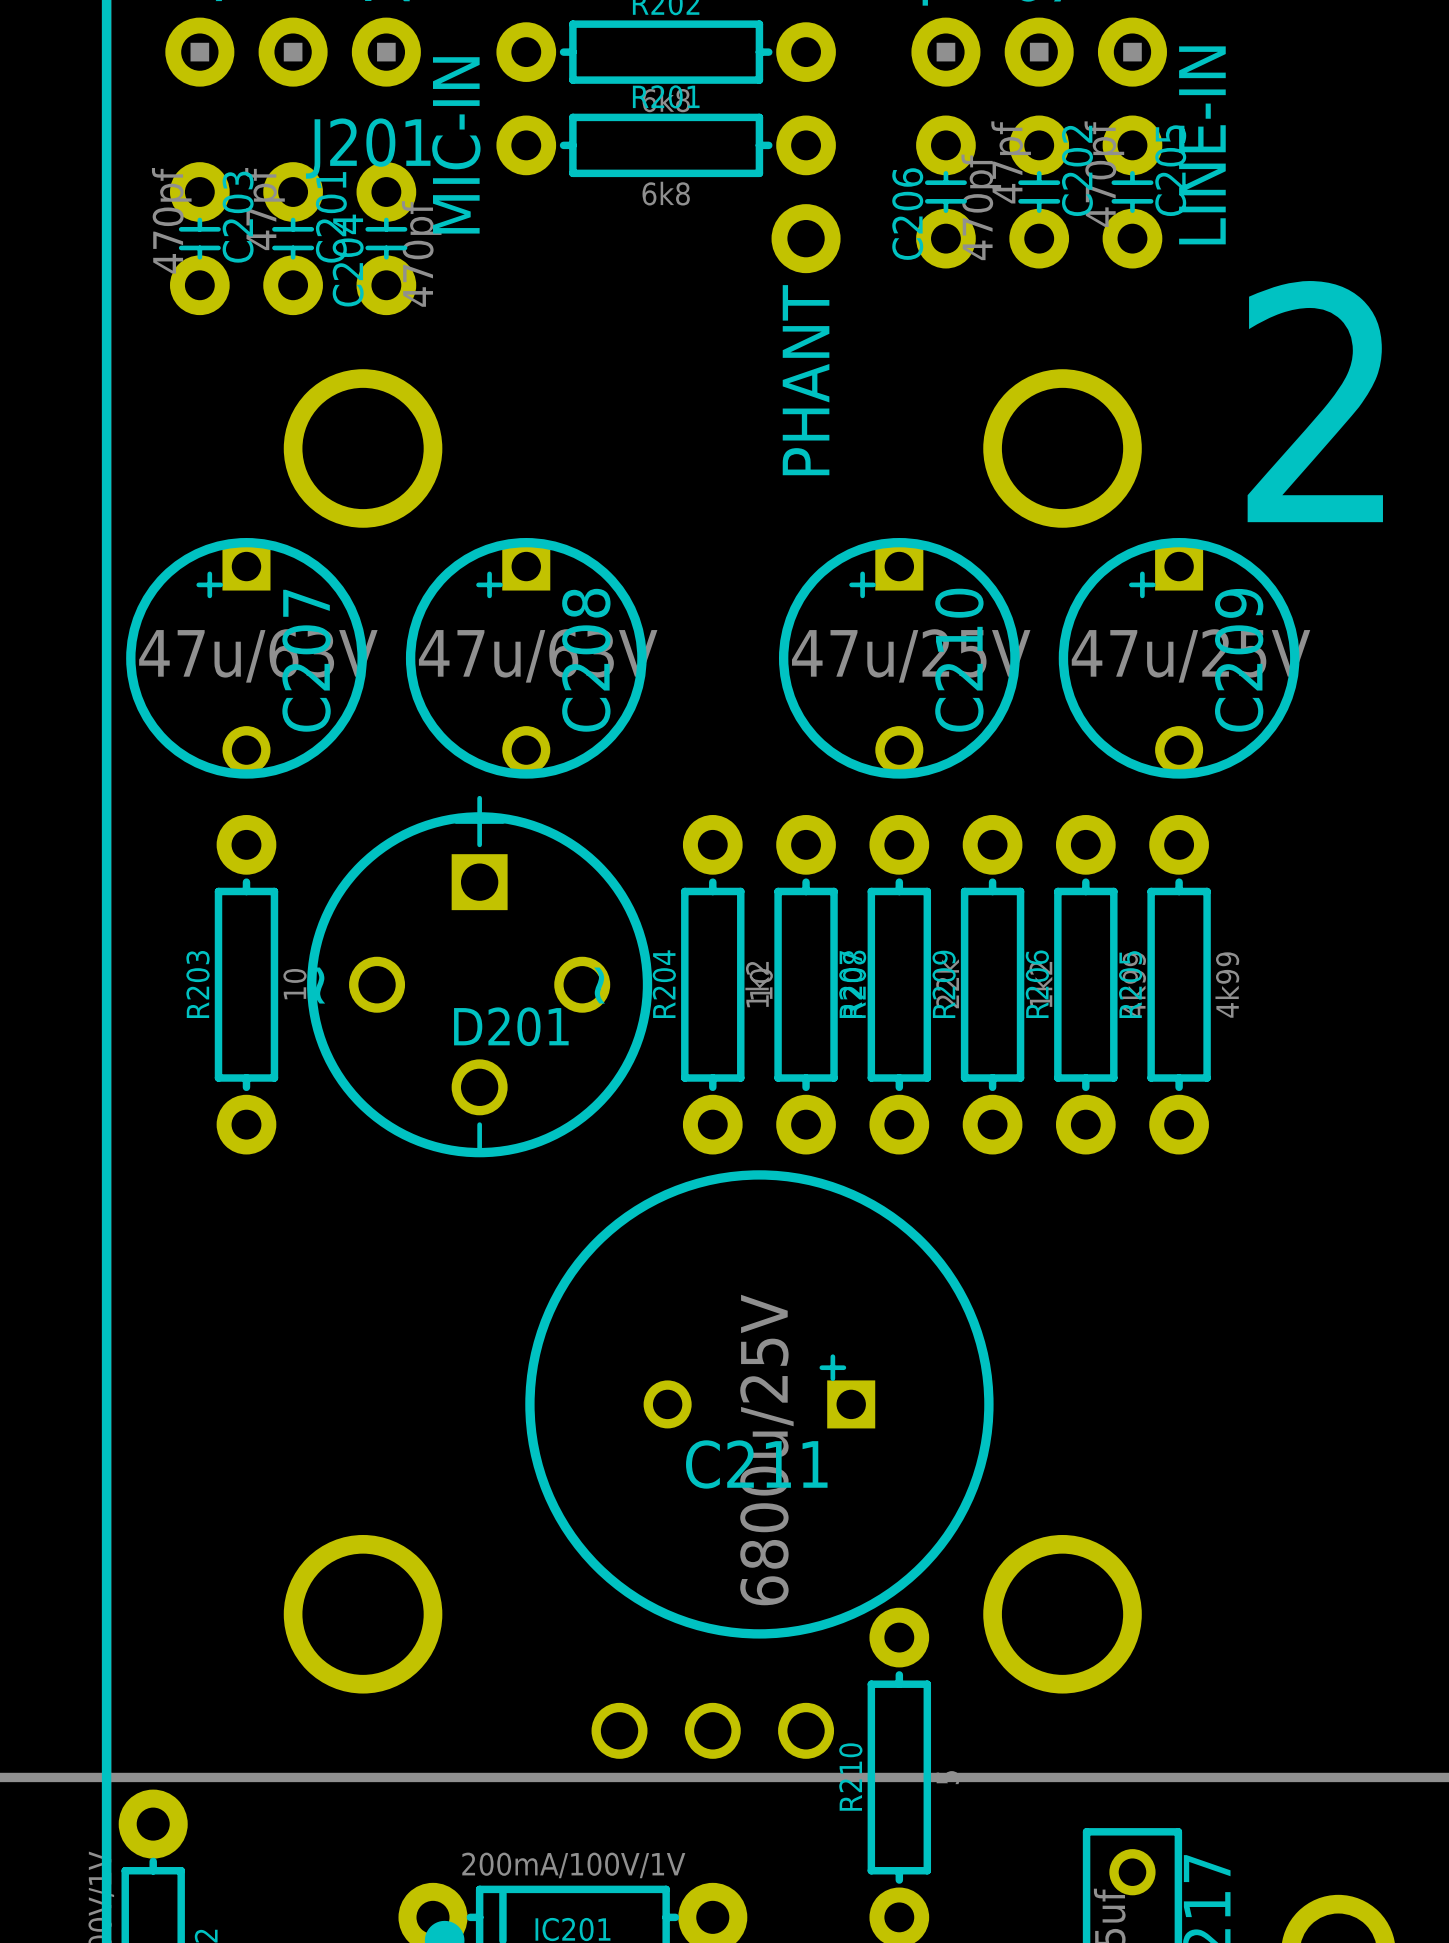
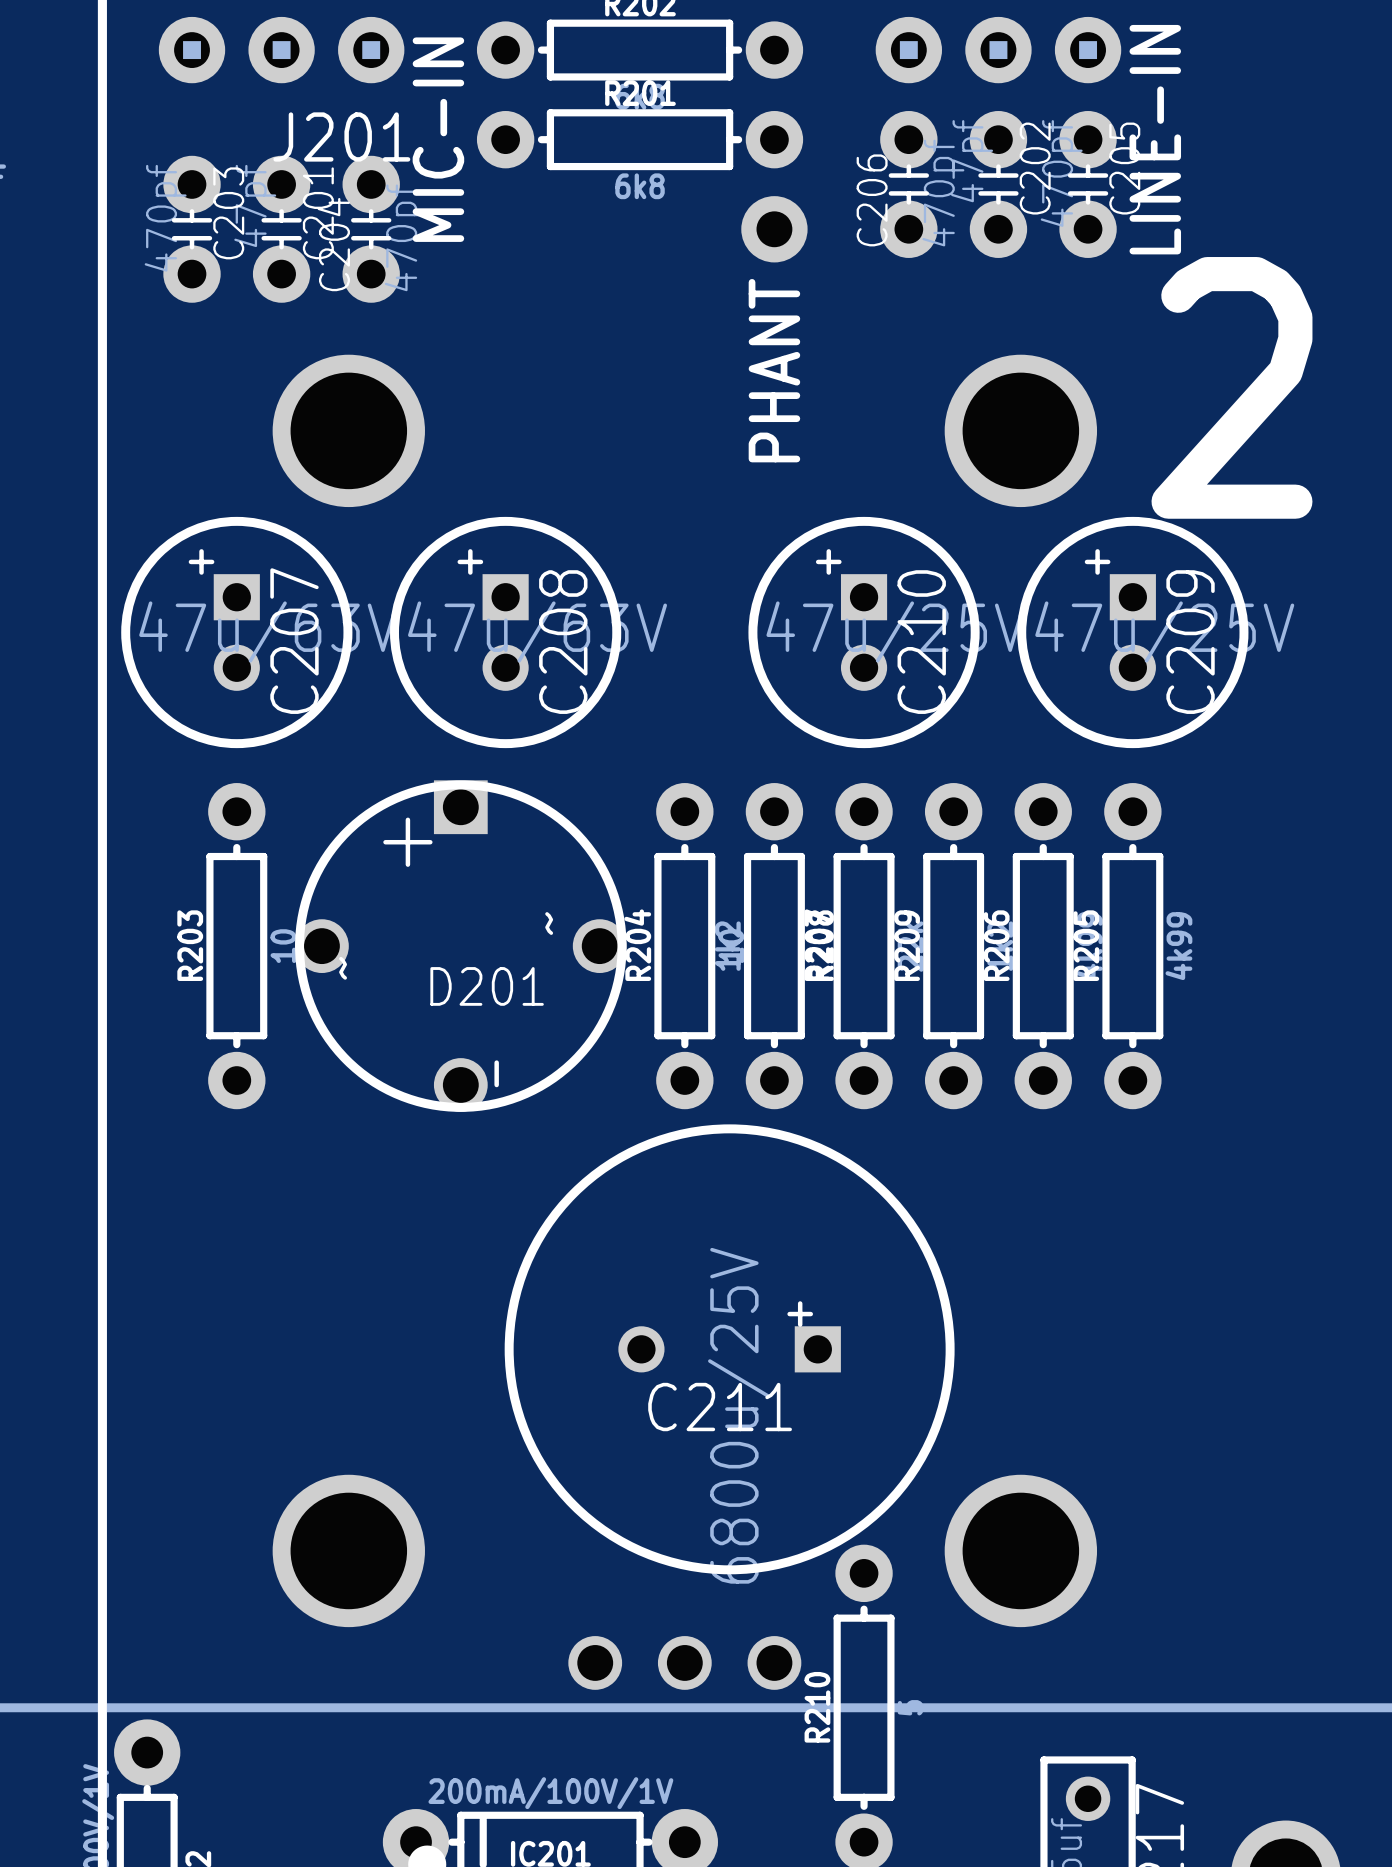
C207 footprint: [126, 538, 367, 779] -> [121, 516, 353, 749]
C208 footprint: [405, 538, 647, 779] -> [390, 516, 622, 749]
C210 footprint: [778, 538, 1020, 779] -> [748, 516, 980, 749]
C209 footprint: [1058, 538, 1300, 779] -> [1017, 516, 1249, 749]
D201 footprint: [307, 795, 653, 1158] -> [295, 780, 627, 1112]

